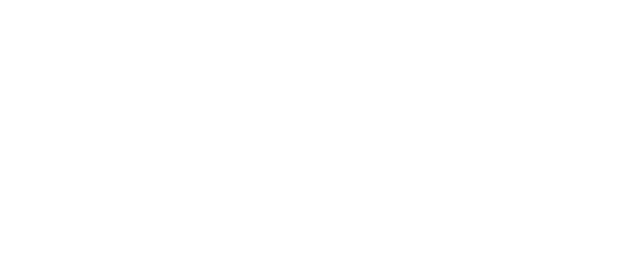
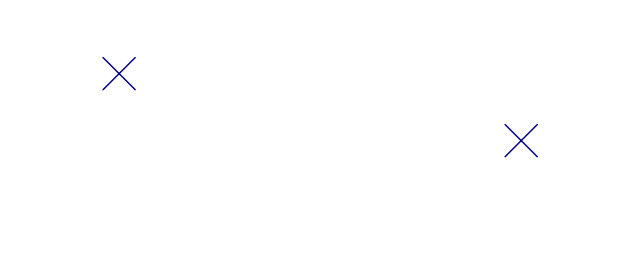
no-connect mark: none -> (119, 73)
no-connect mark: none -> (521, 140)

